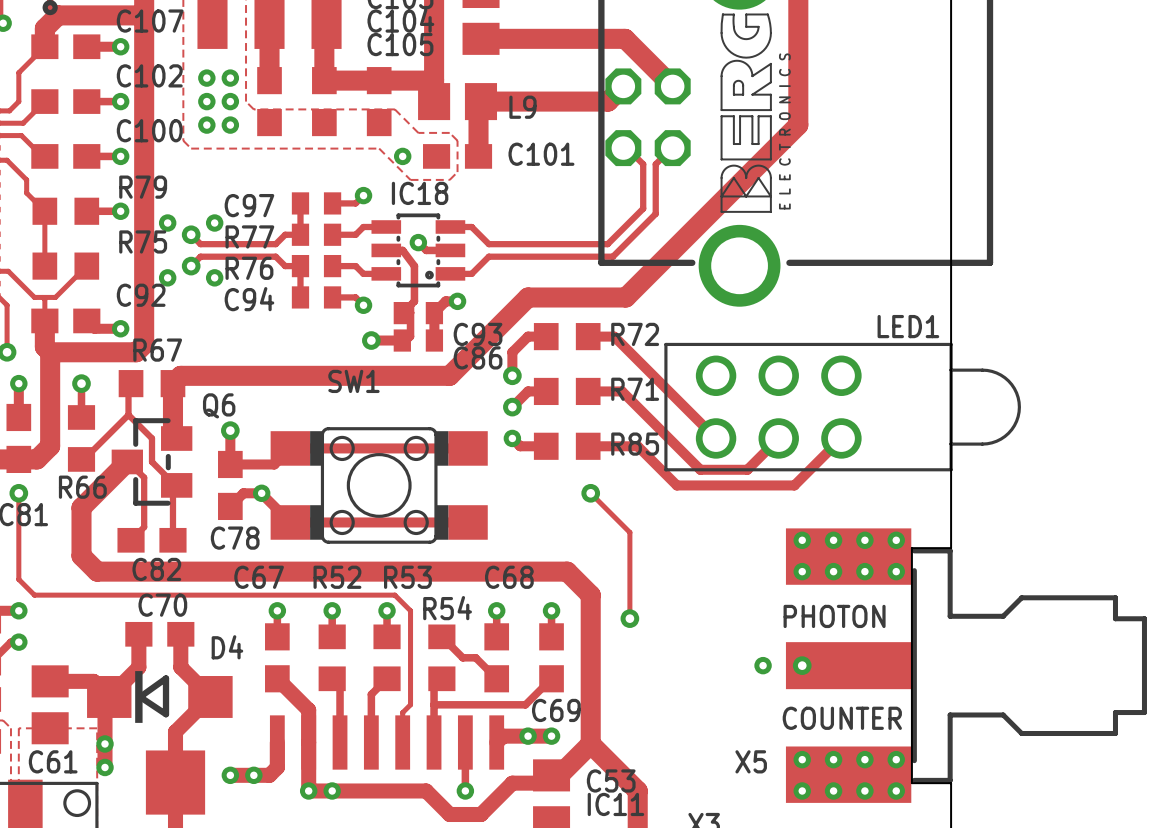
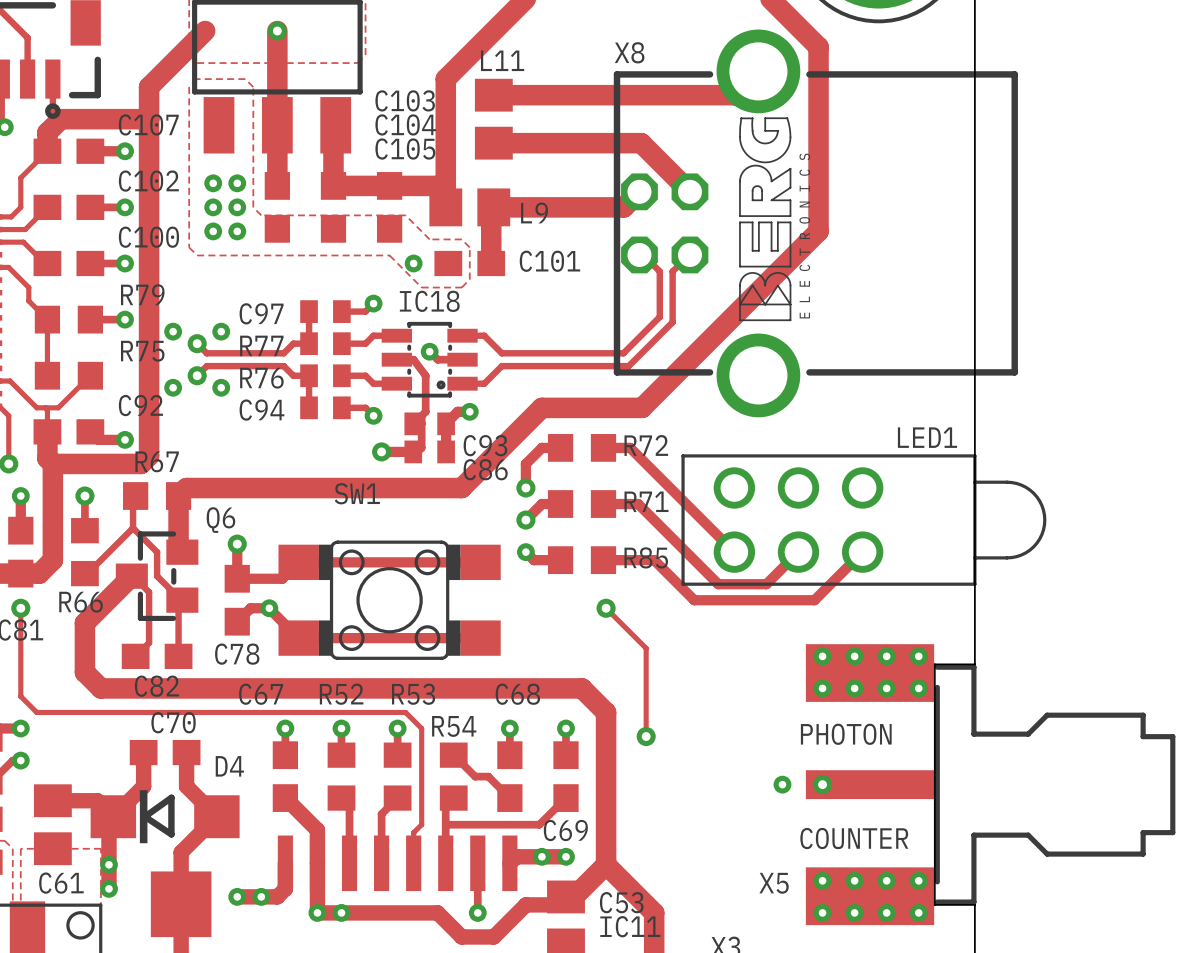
X5 footprint: [785, 528, 1147, 803] -> [805, 644, 1176, 926]

